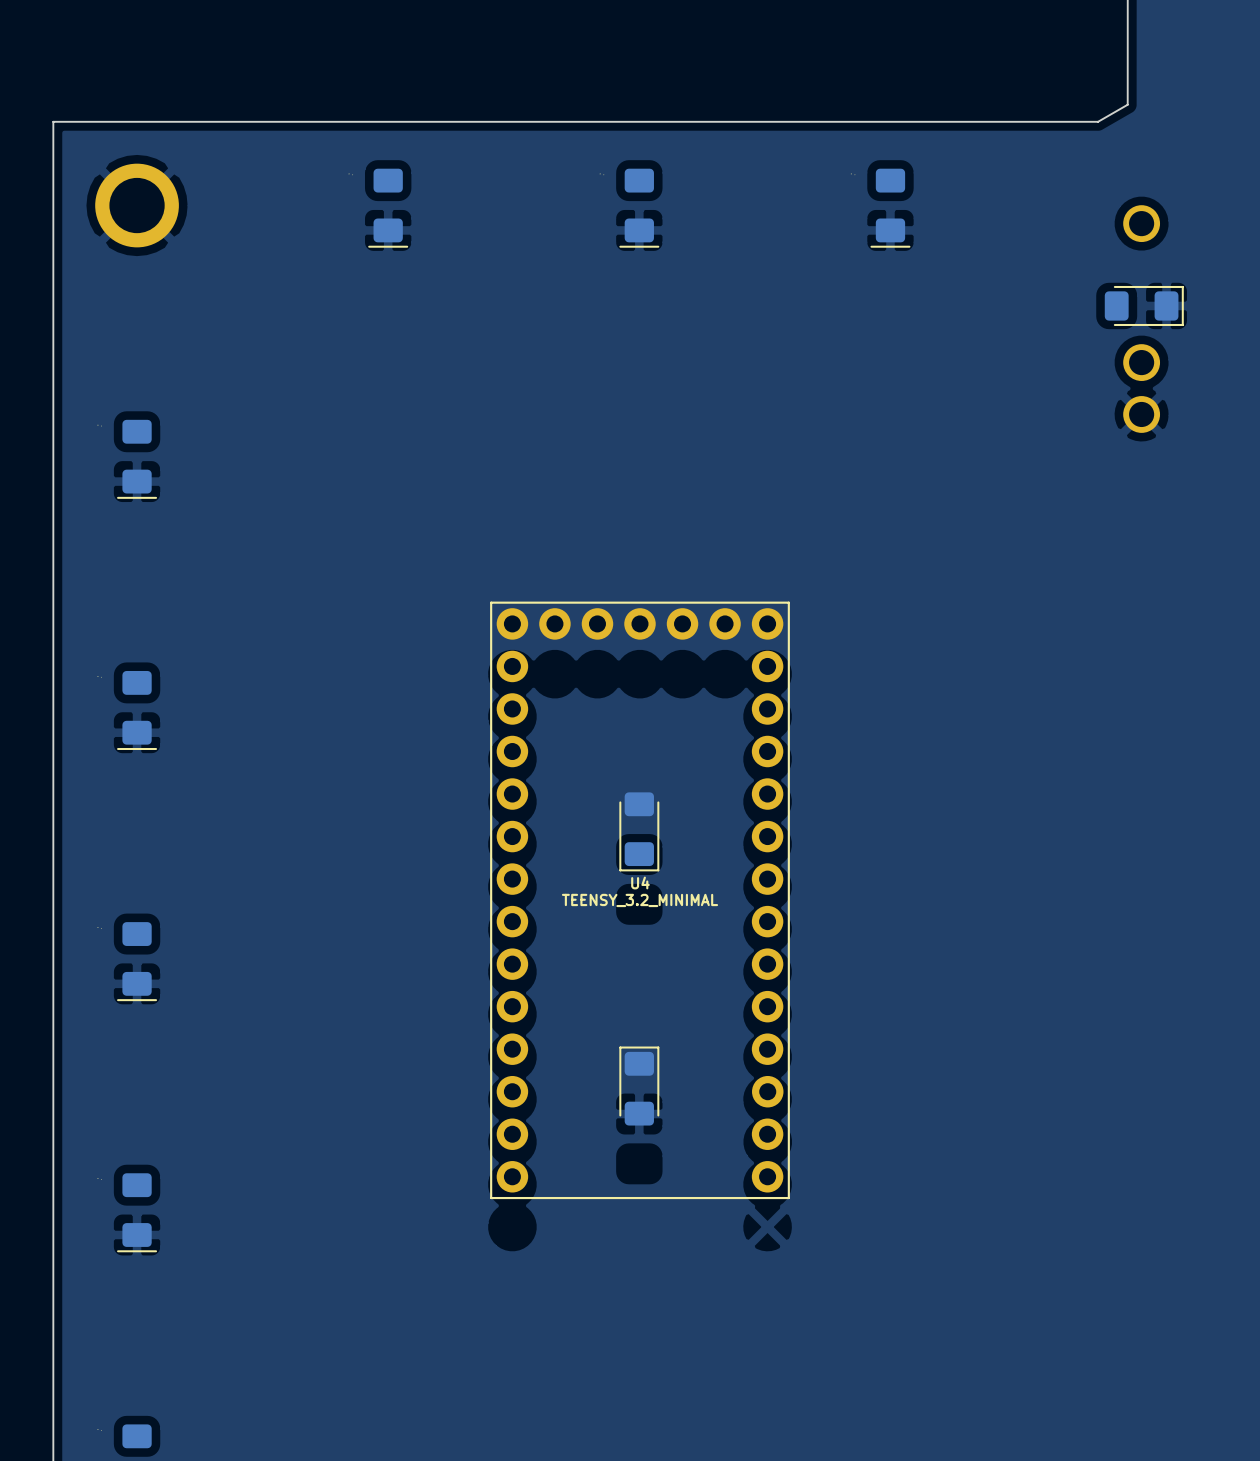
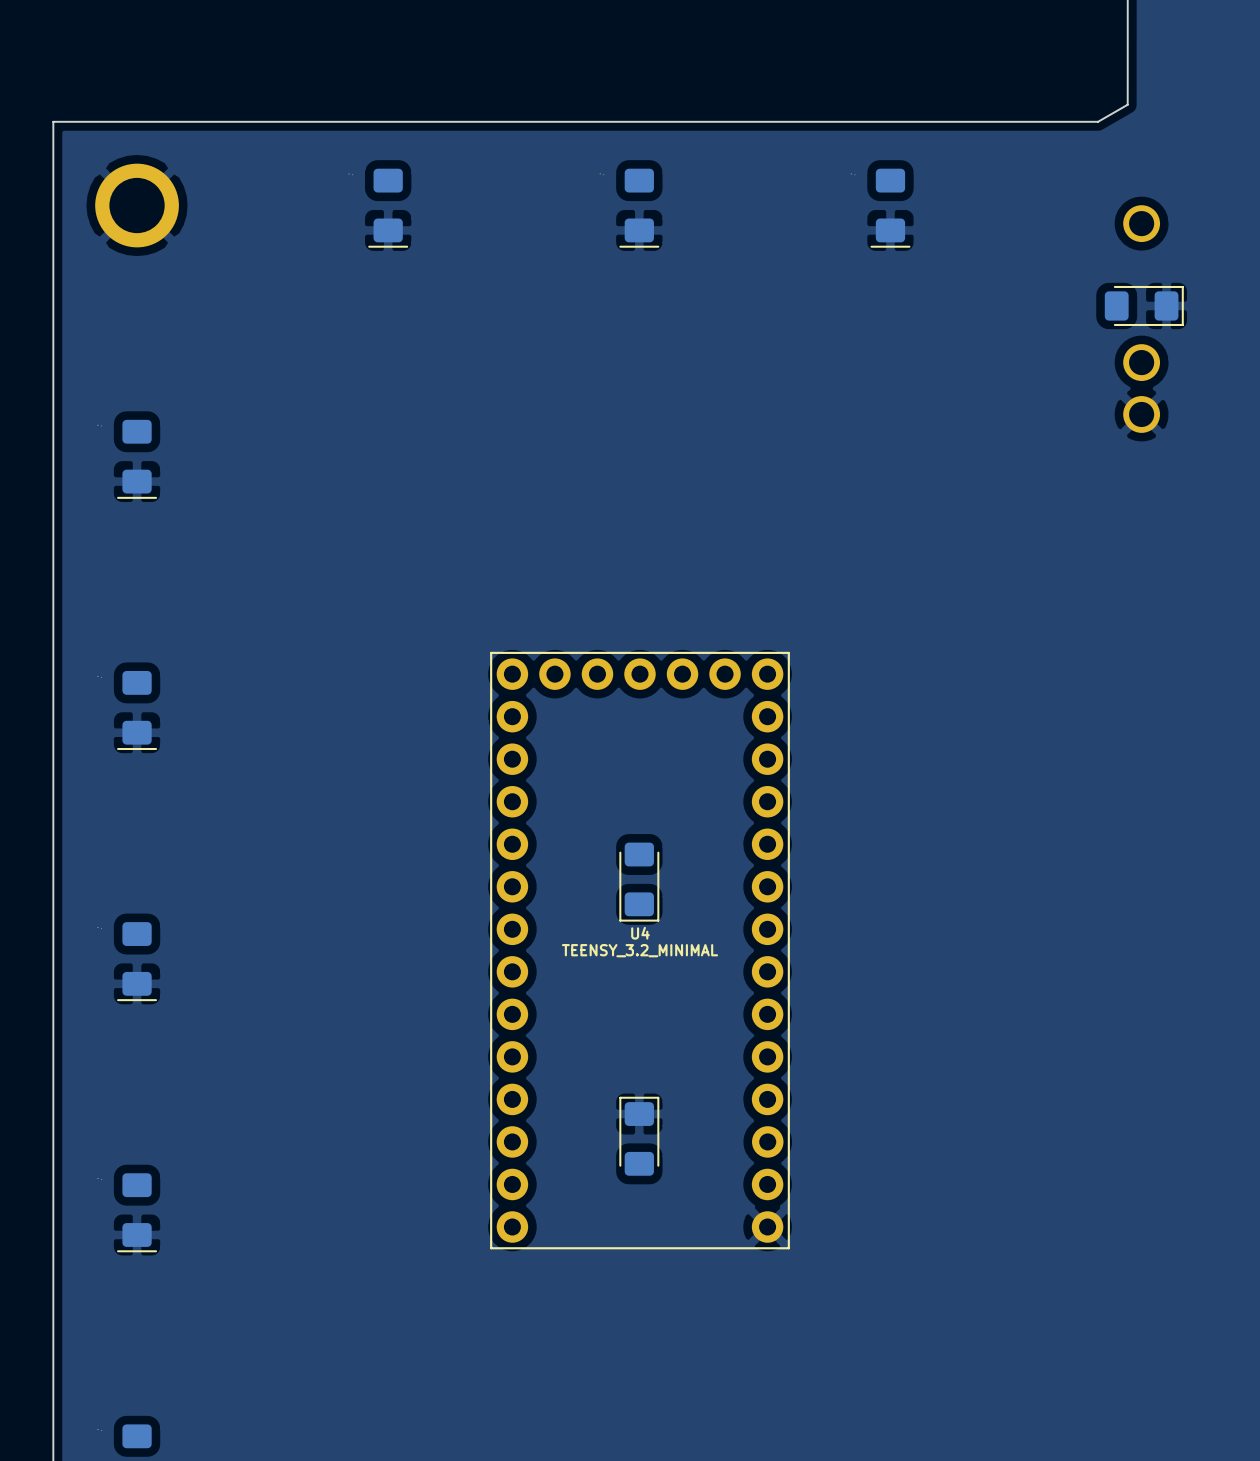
part position: (639, 831) -> (639, 882)
U4 position: (640, 900) -> (640, 950)
part position: (639, 1086) -> (639, 1136)

